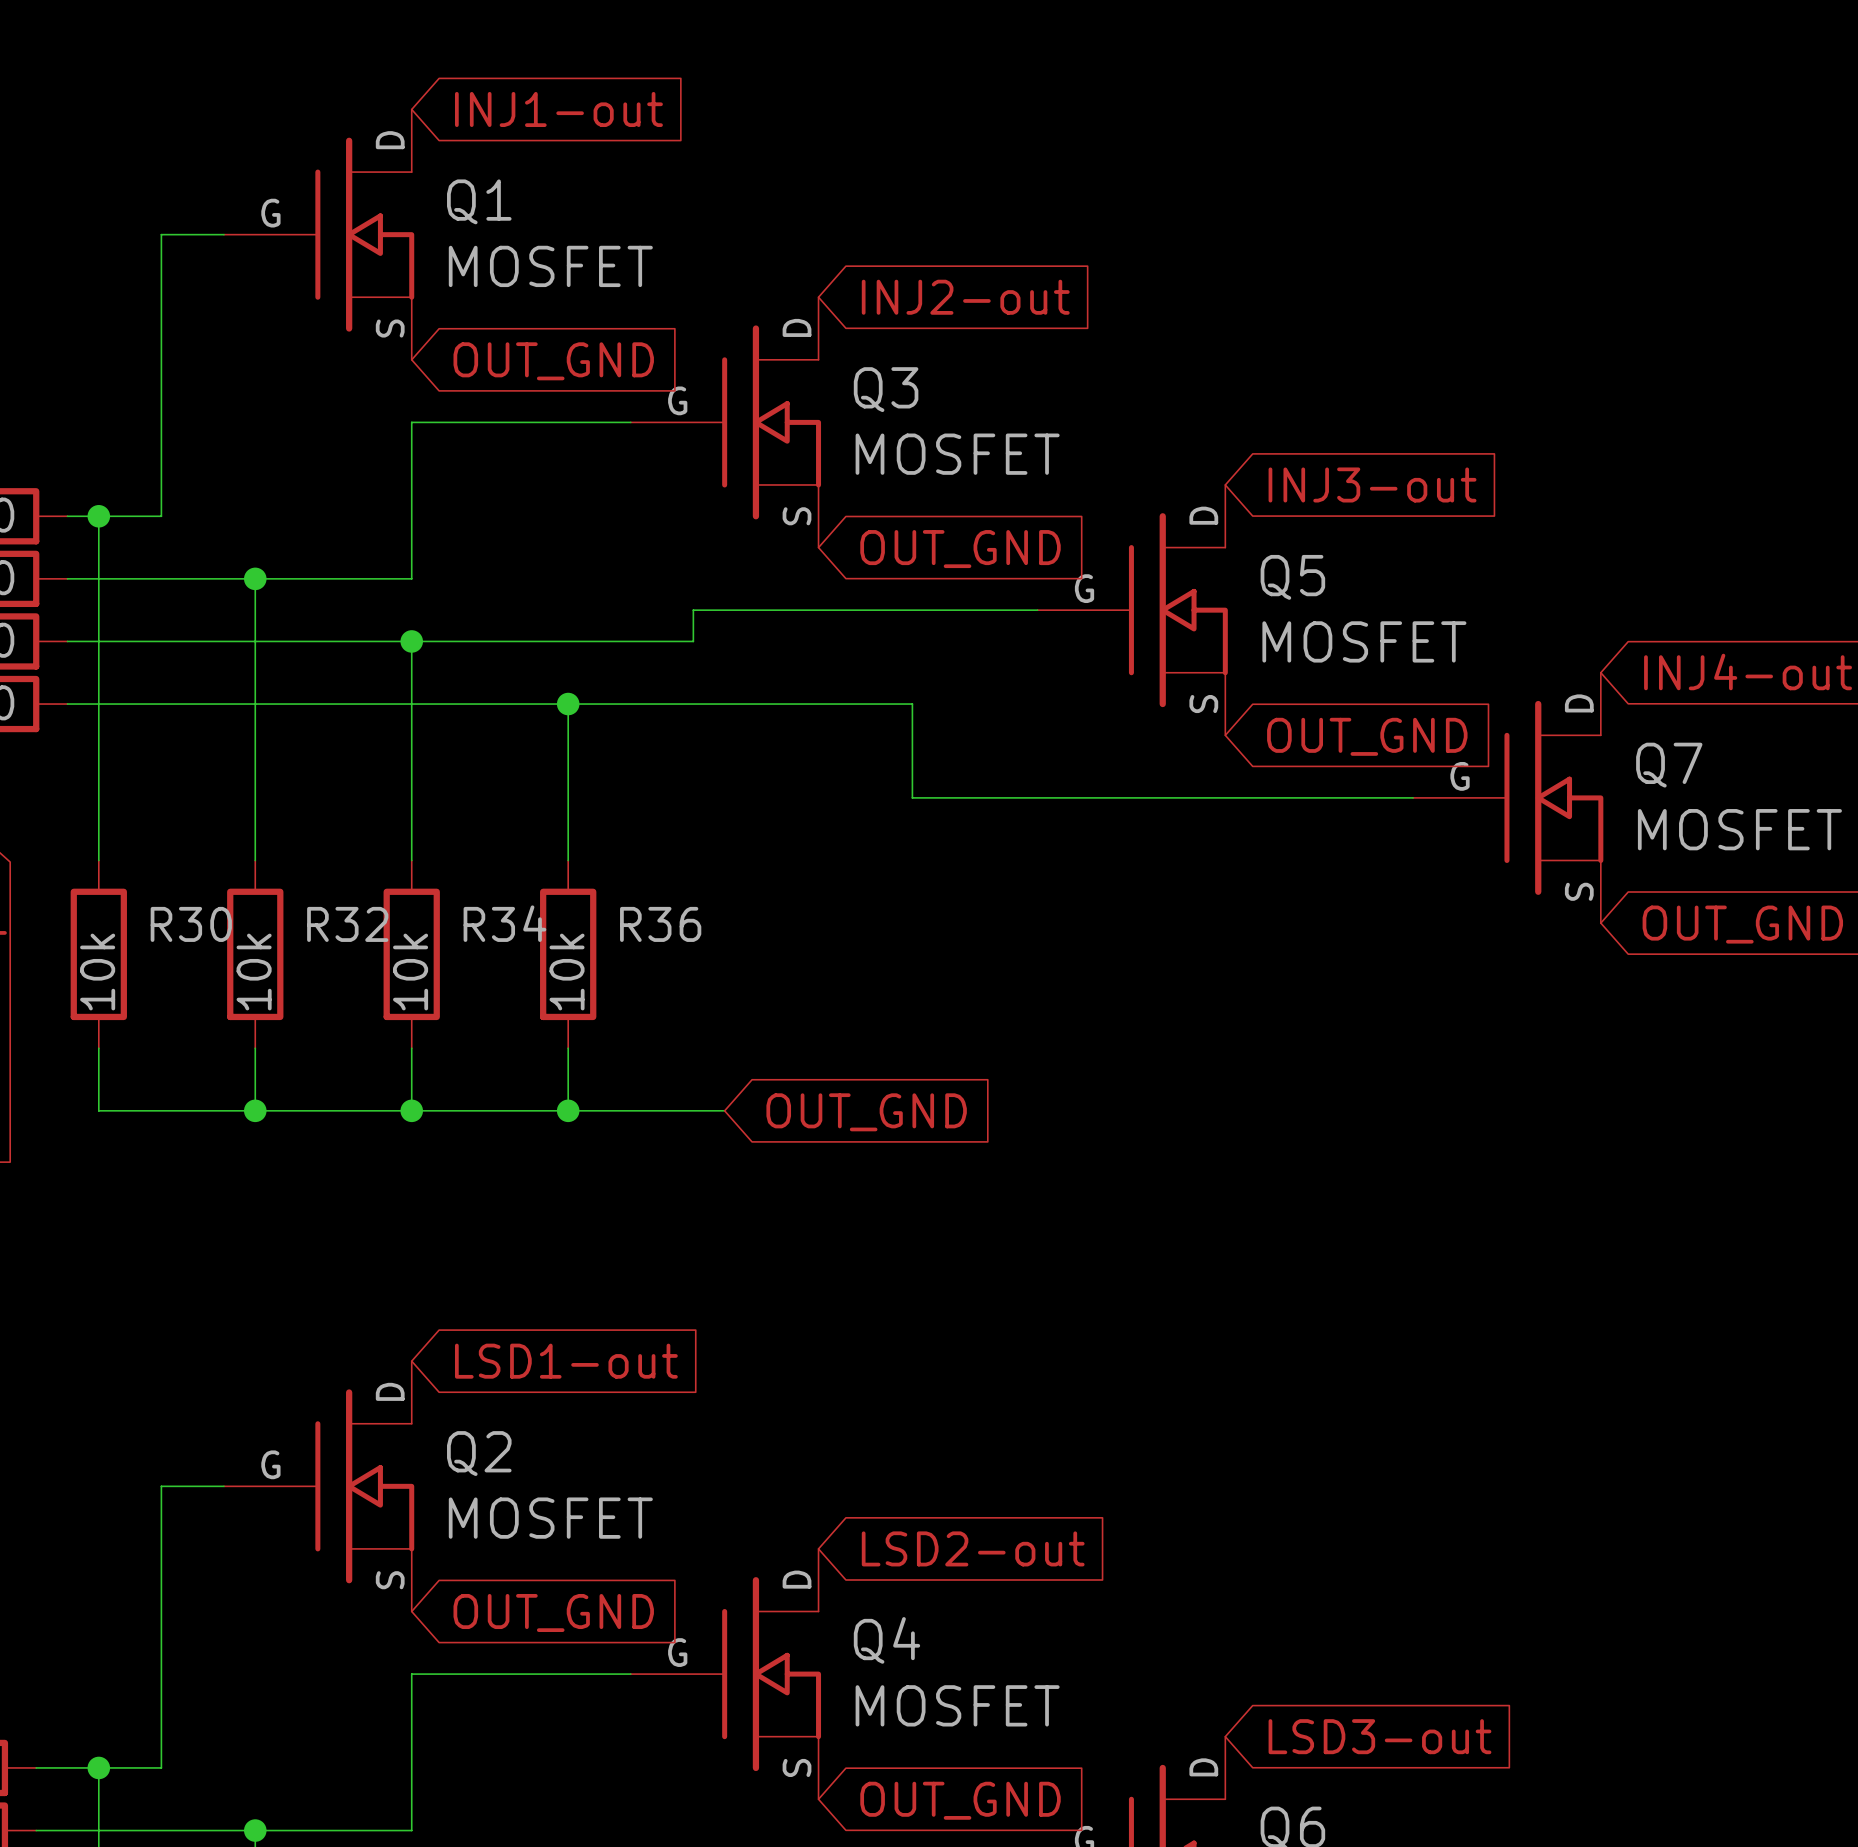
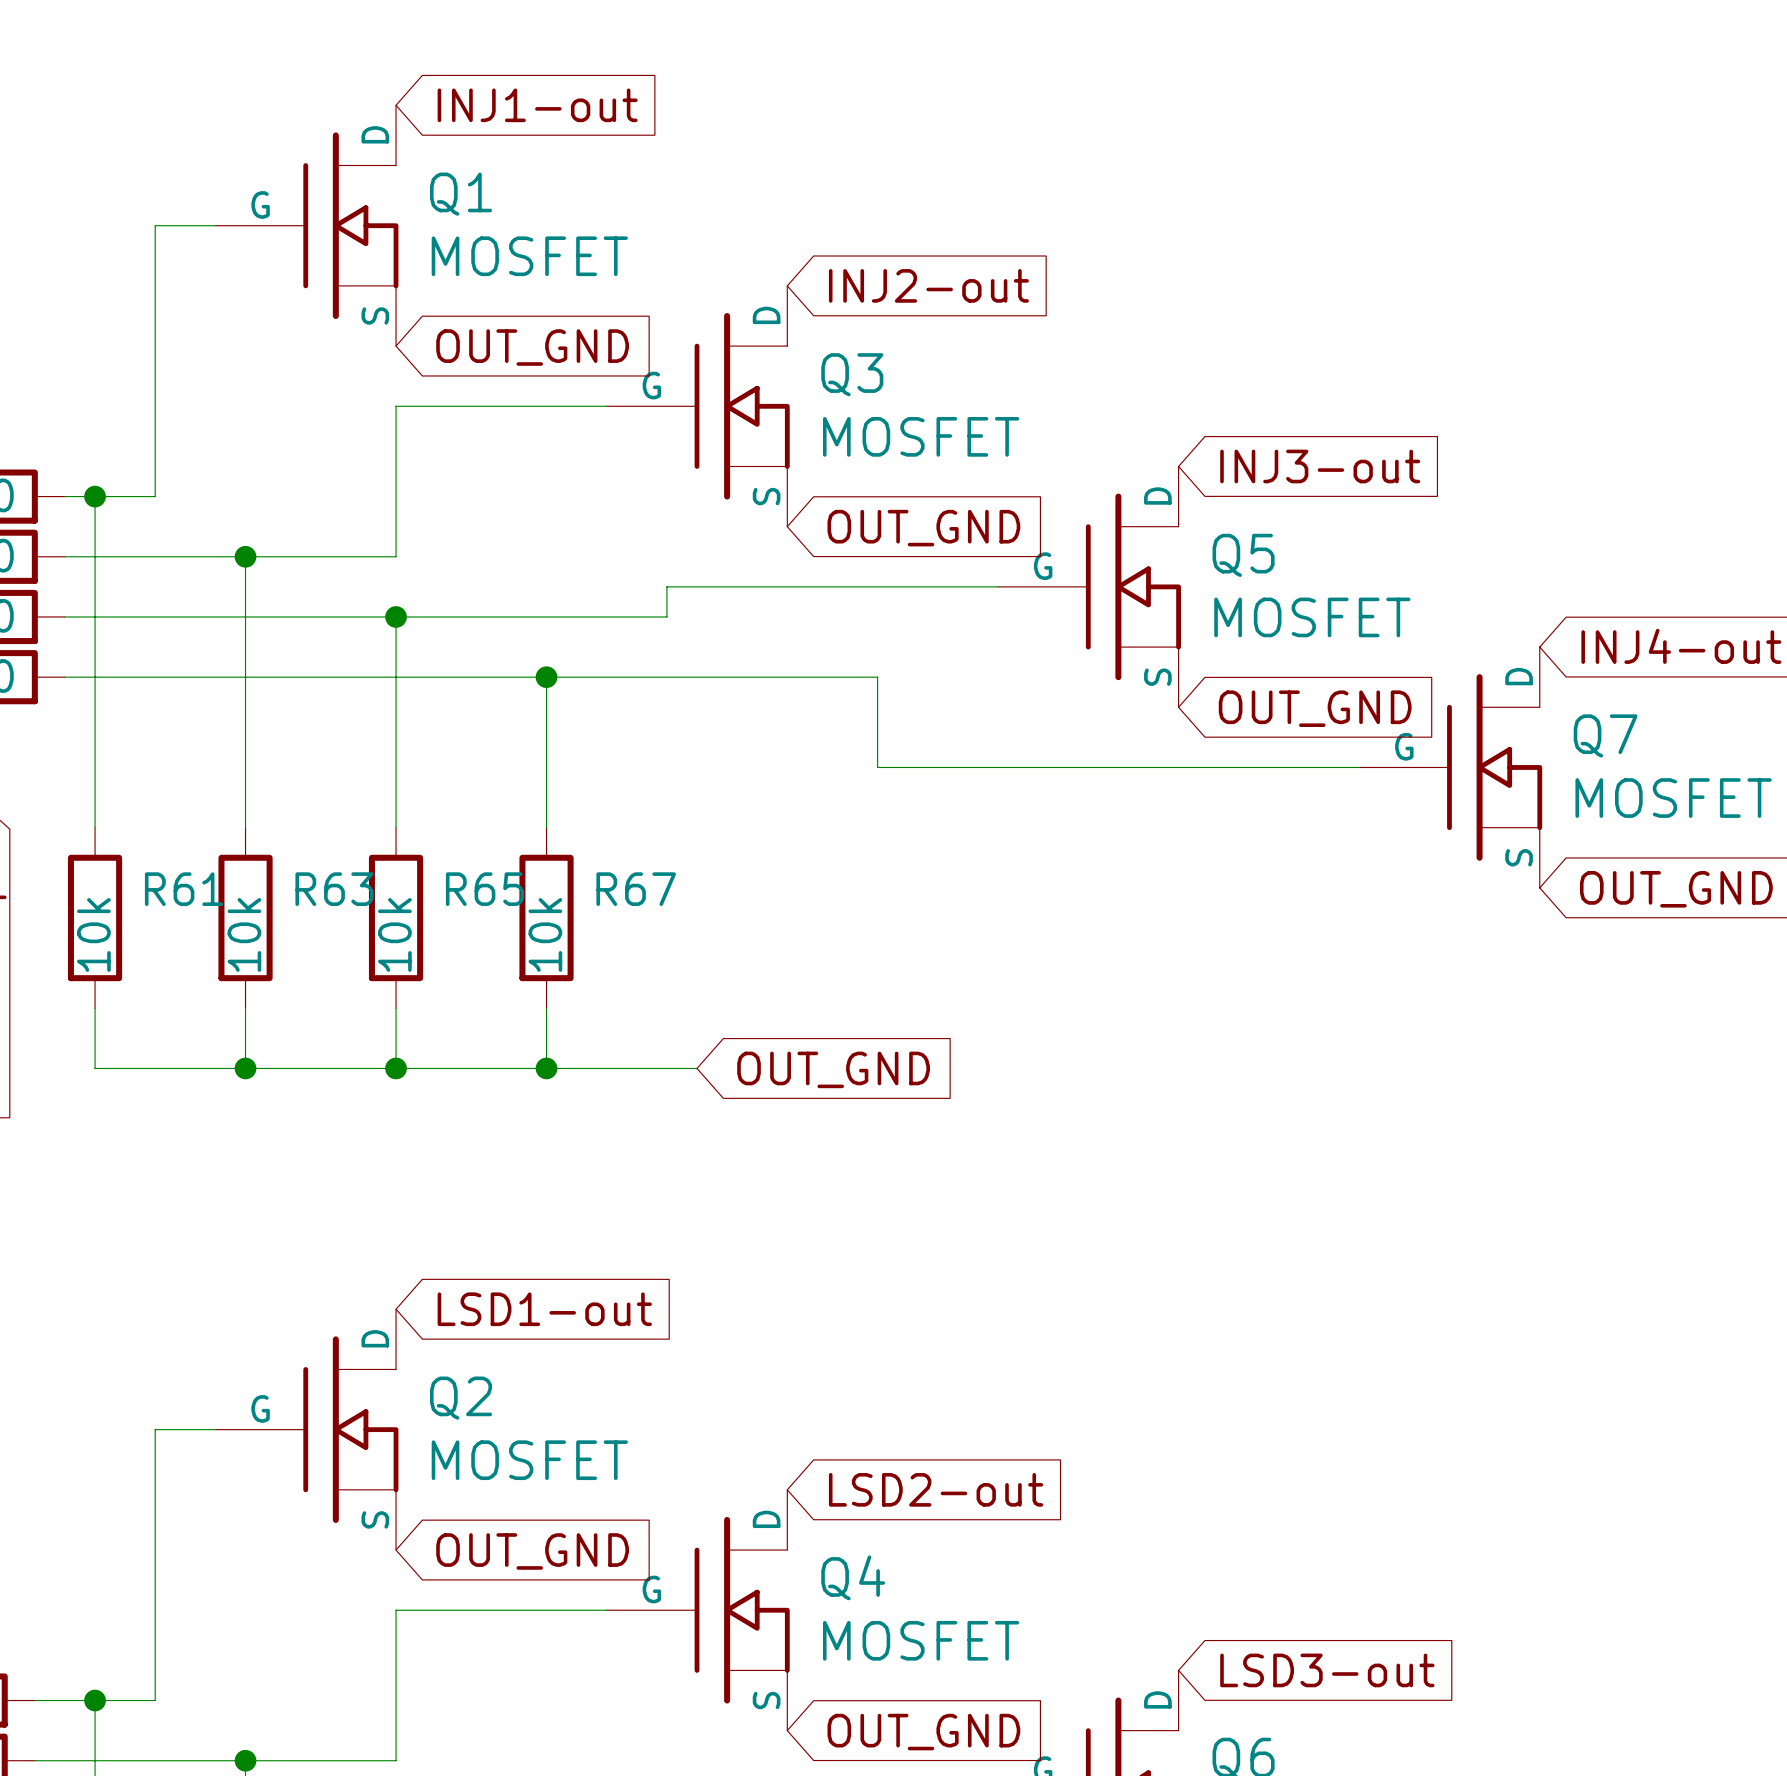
R34 name: R34 (504, 923) -> R65 (484, 889)
R30 name: R30 (191, 924) -> R61 (183, 889)
R32 name: R32 (347, 924) -> R63 (334, 889)
R36 name: R36 (660, 924) -> R67 (636, 889)

